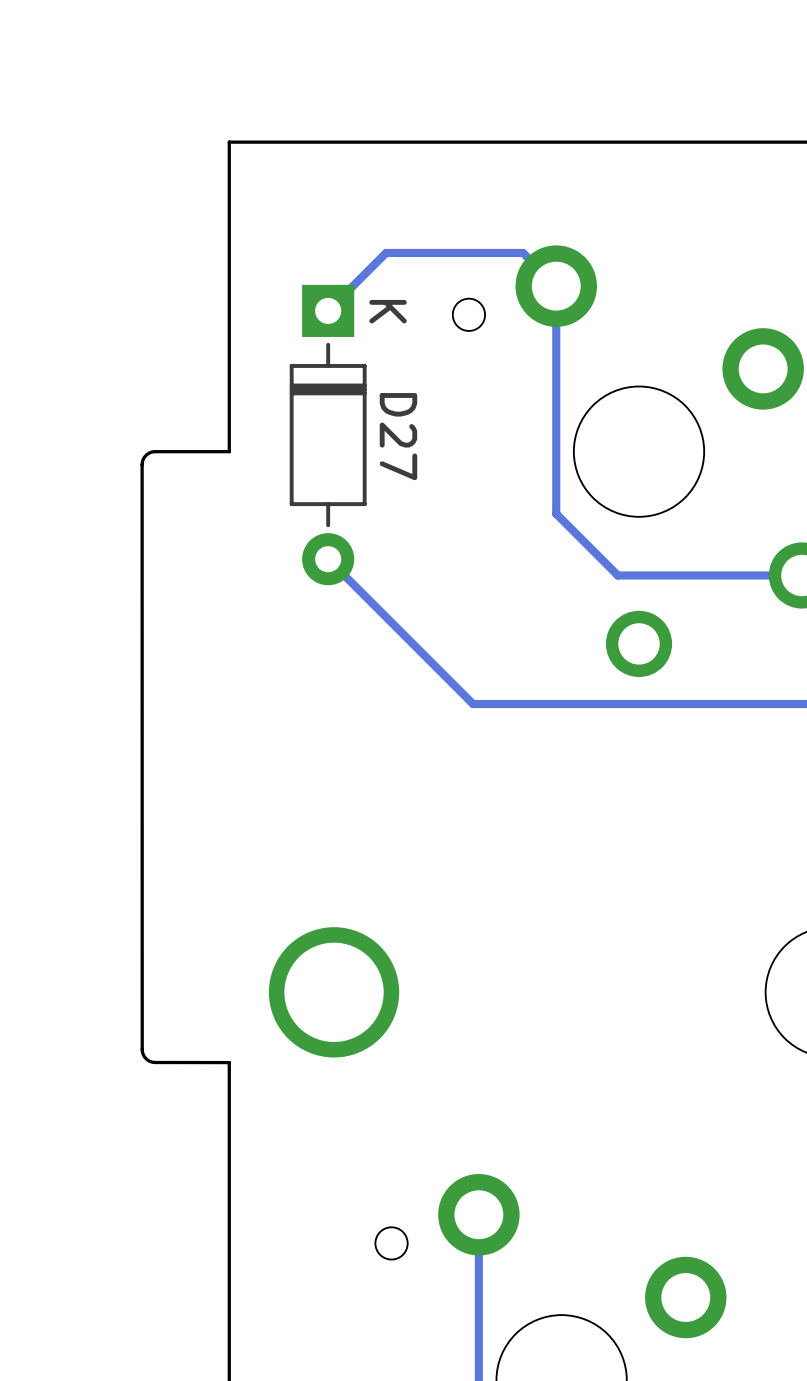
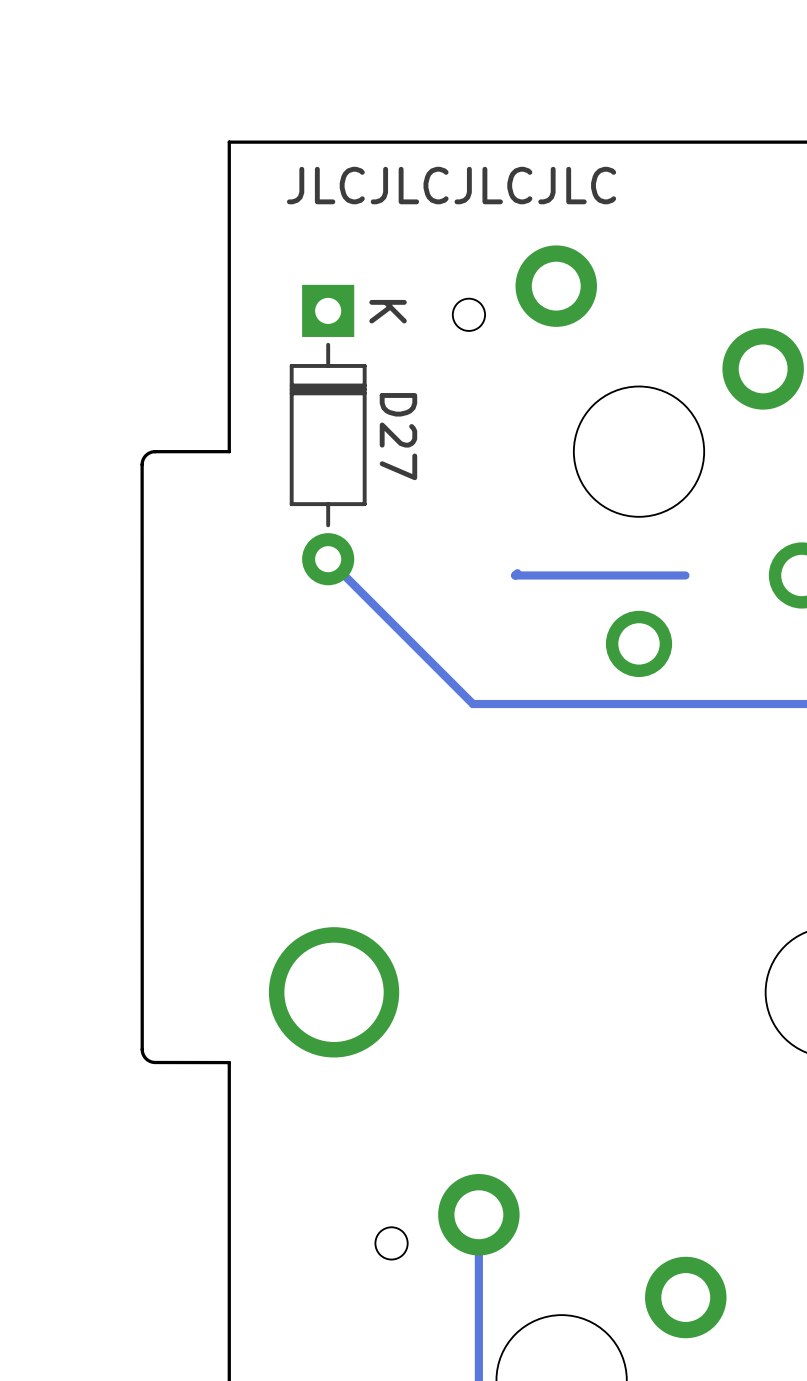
text: none -> JLCJLCJLCJLC (451, 185)
track: (328, 310) (386, 252) (523, 252) (556, 286) (556, 513) (617, 575) -> (517, 573) (515, 575) (617, 575)
track: (801, 575) (685, 575) -> none

